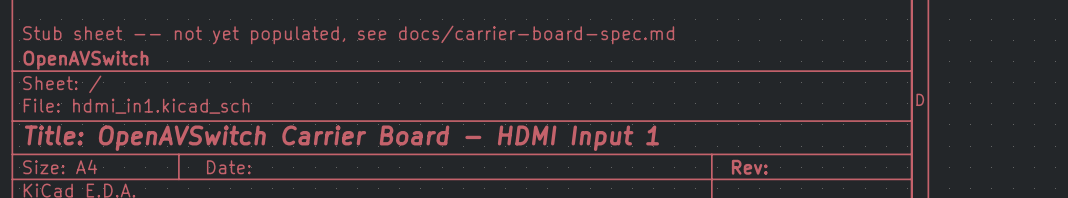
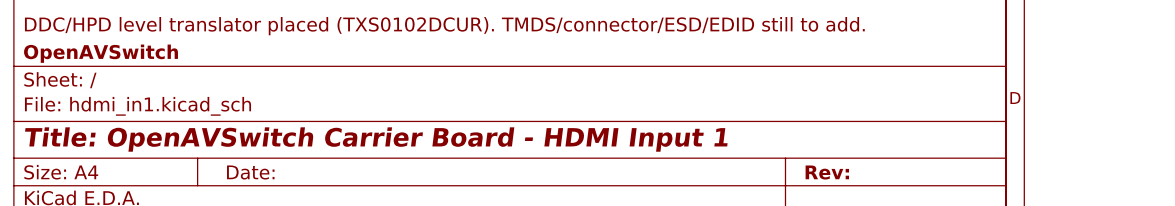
title block: Stub sheet -- not yet populated, see docs/carrier-board-spec.md (348, 34) -> DDC/HPD level translator placed (TXS0102DCUR). TMDS/connector/ESD/EDID still to add. (444, 26)

